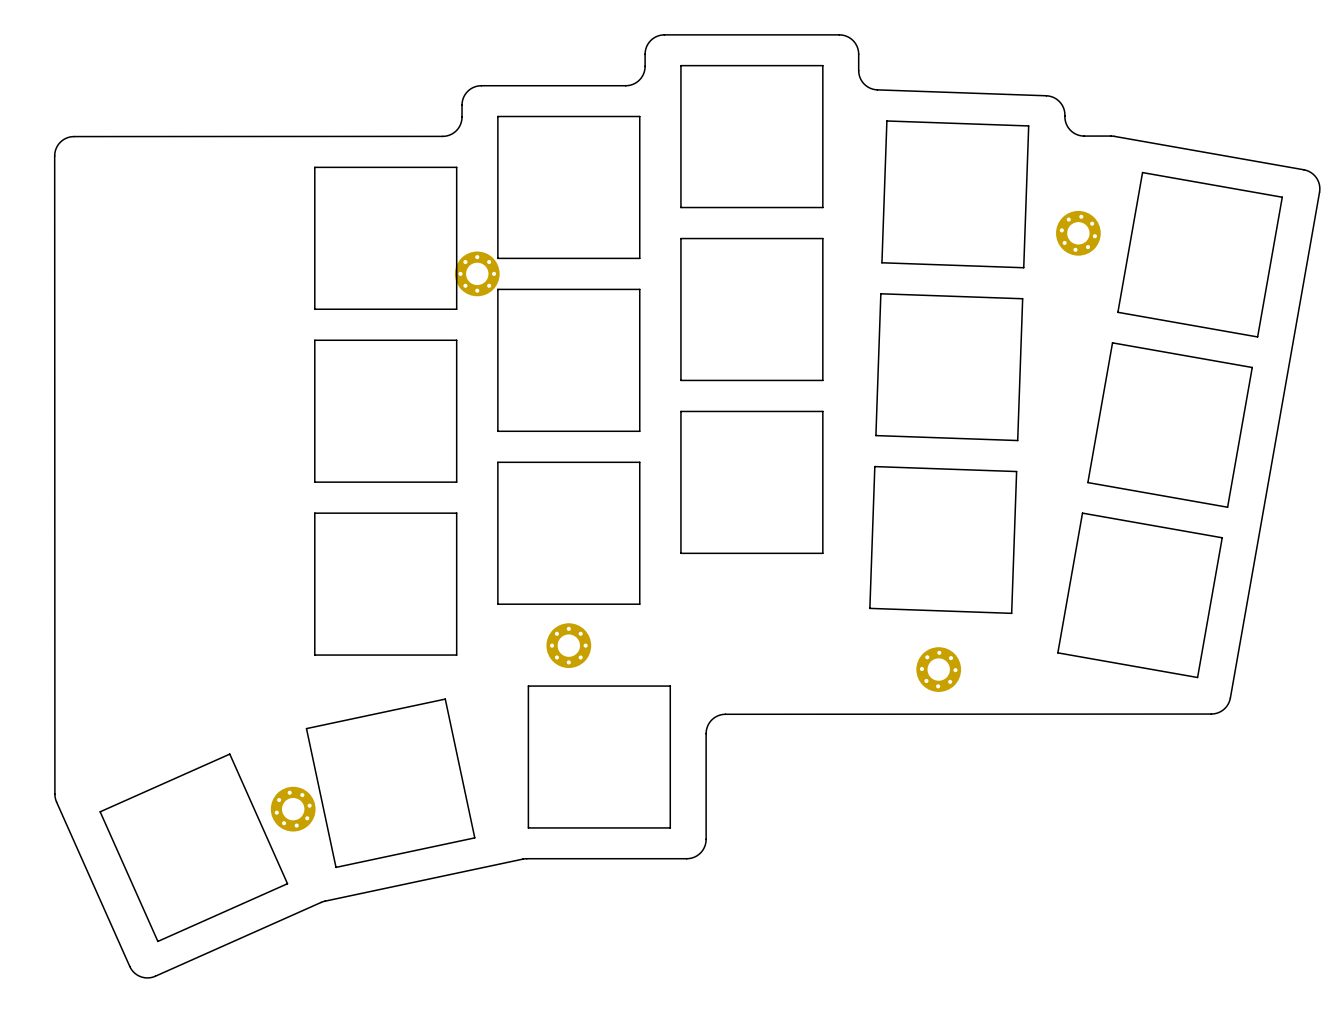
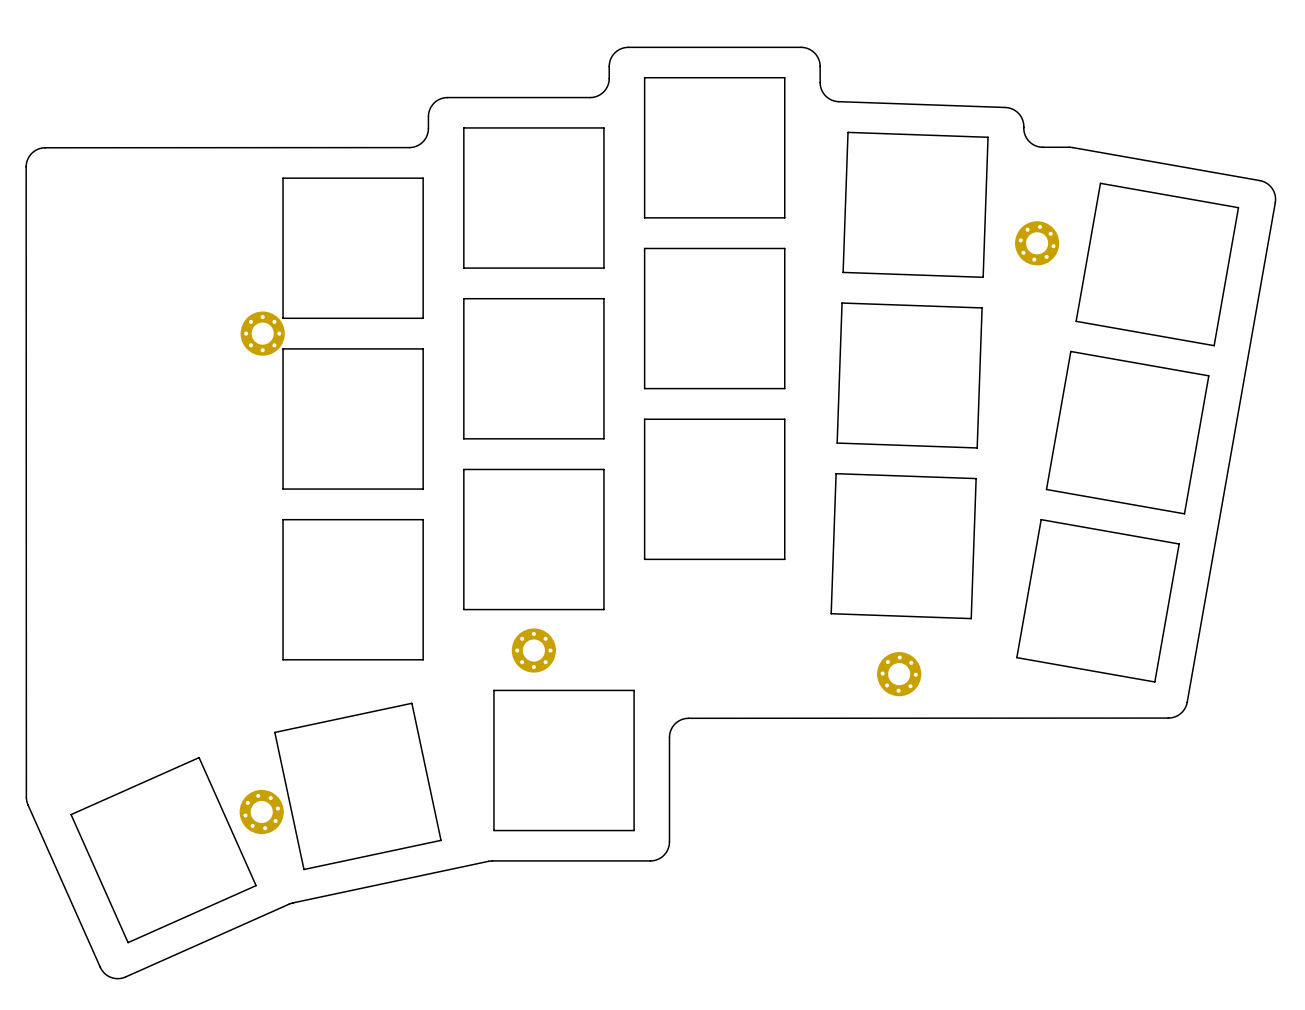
part position: (477, 273) -> (262, 333)

